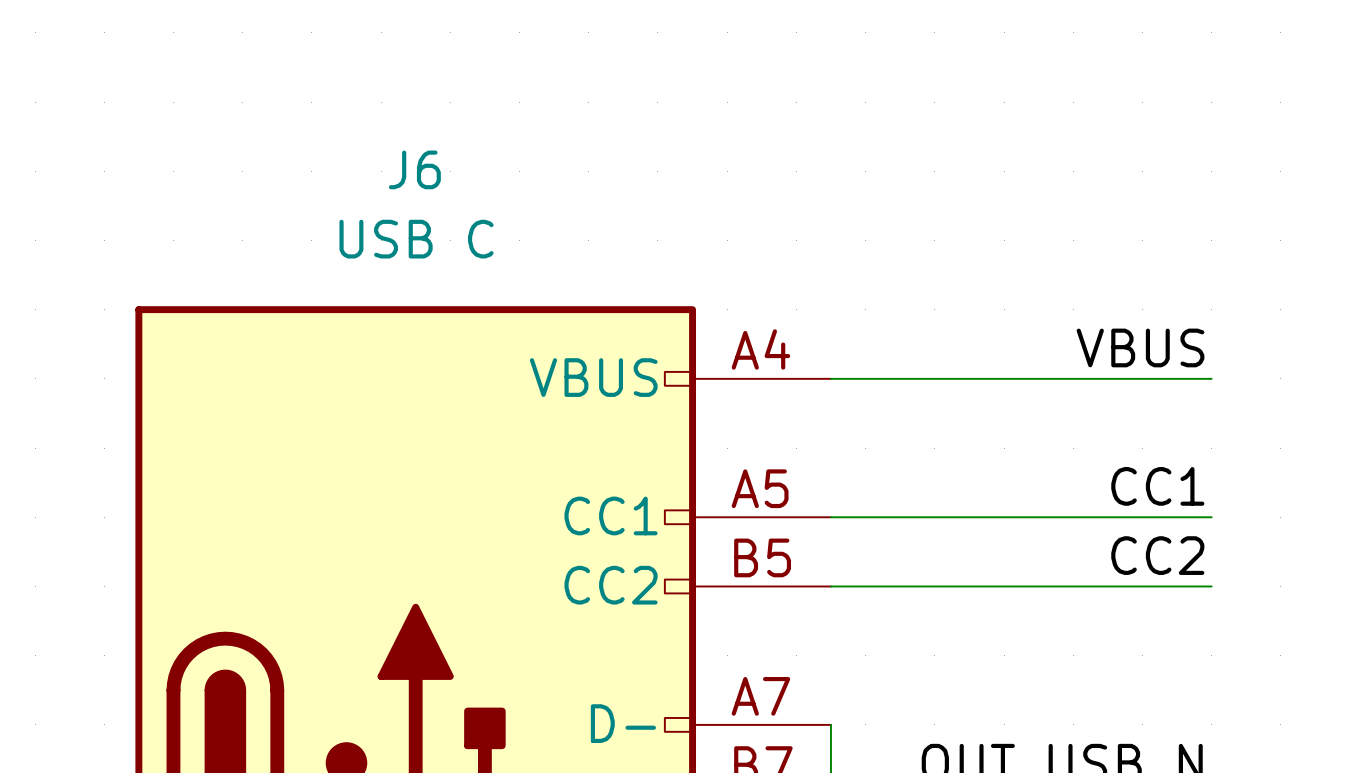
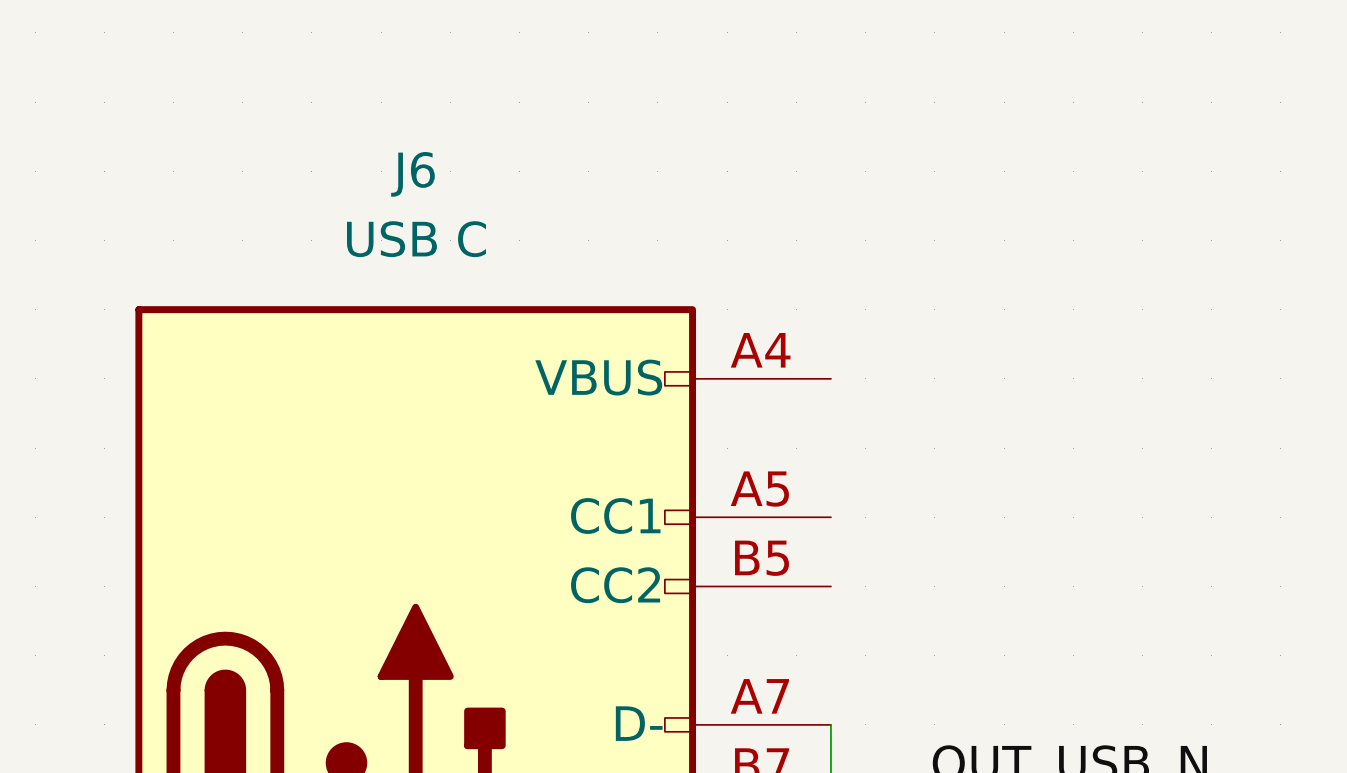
label: VBUS (1140, 347) -> none
wire: (830, 378) (1211, 378) -> none
label: CC1 (1157, 486) -> none
wire: (830, 517) (1211, 517) -> none
label: CC2 (1157, 555) -> none
wire: (830, 586) (1211, 586) -> none

